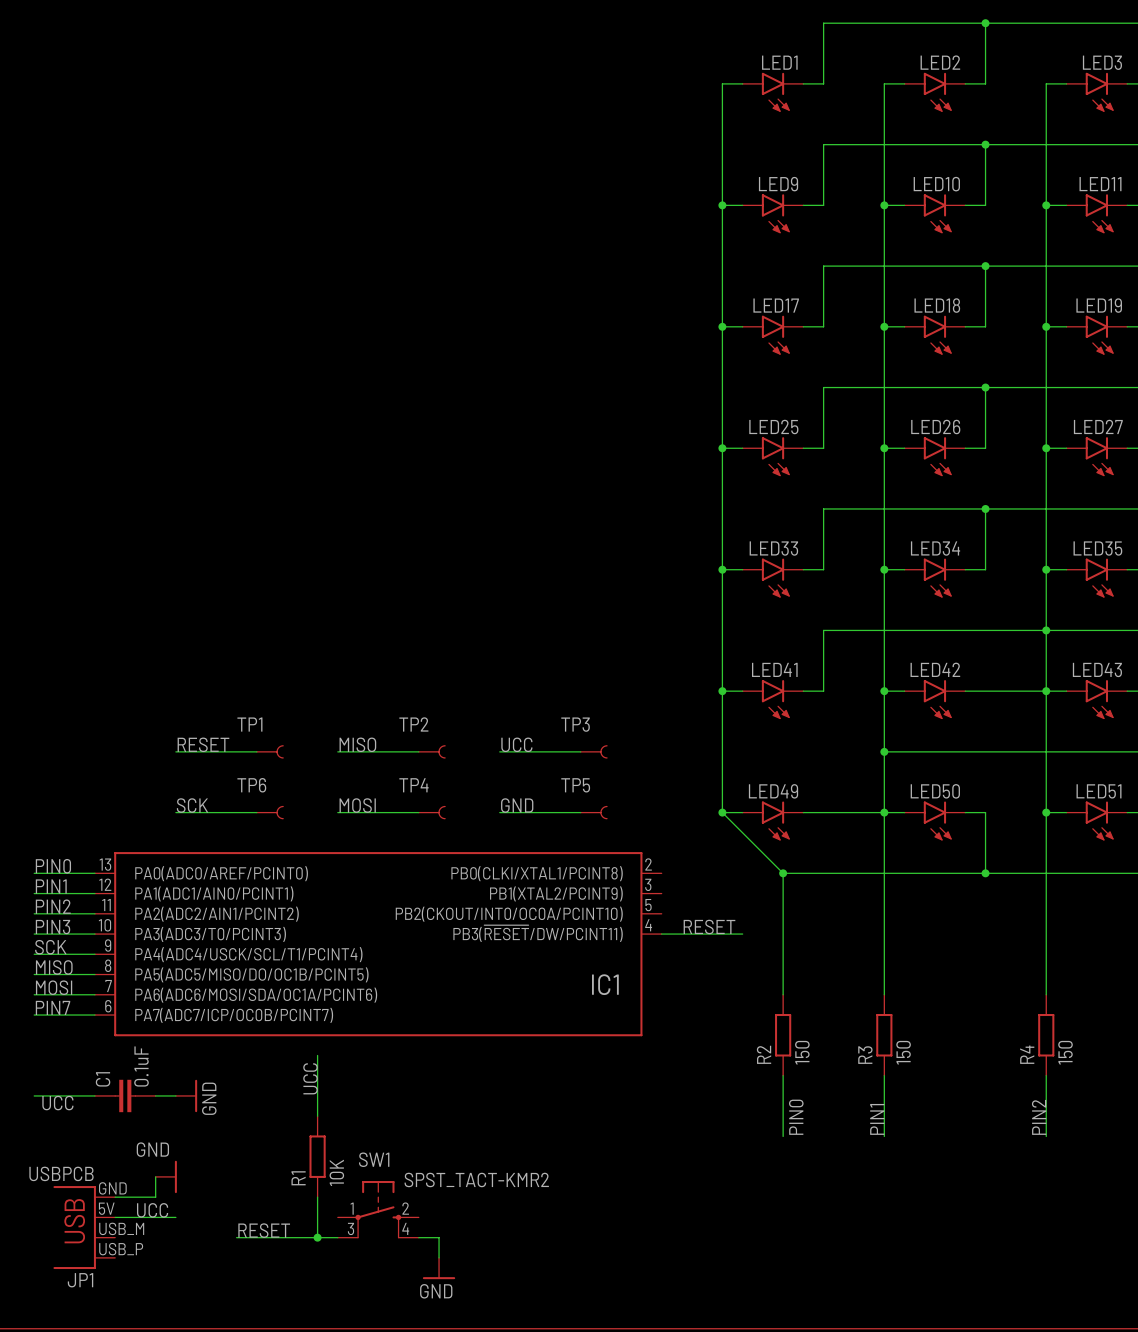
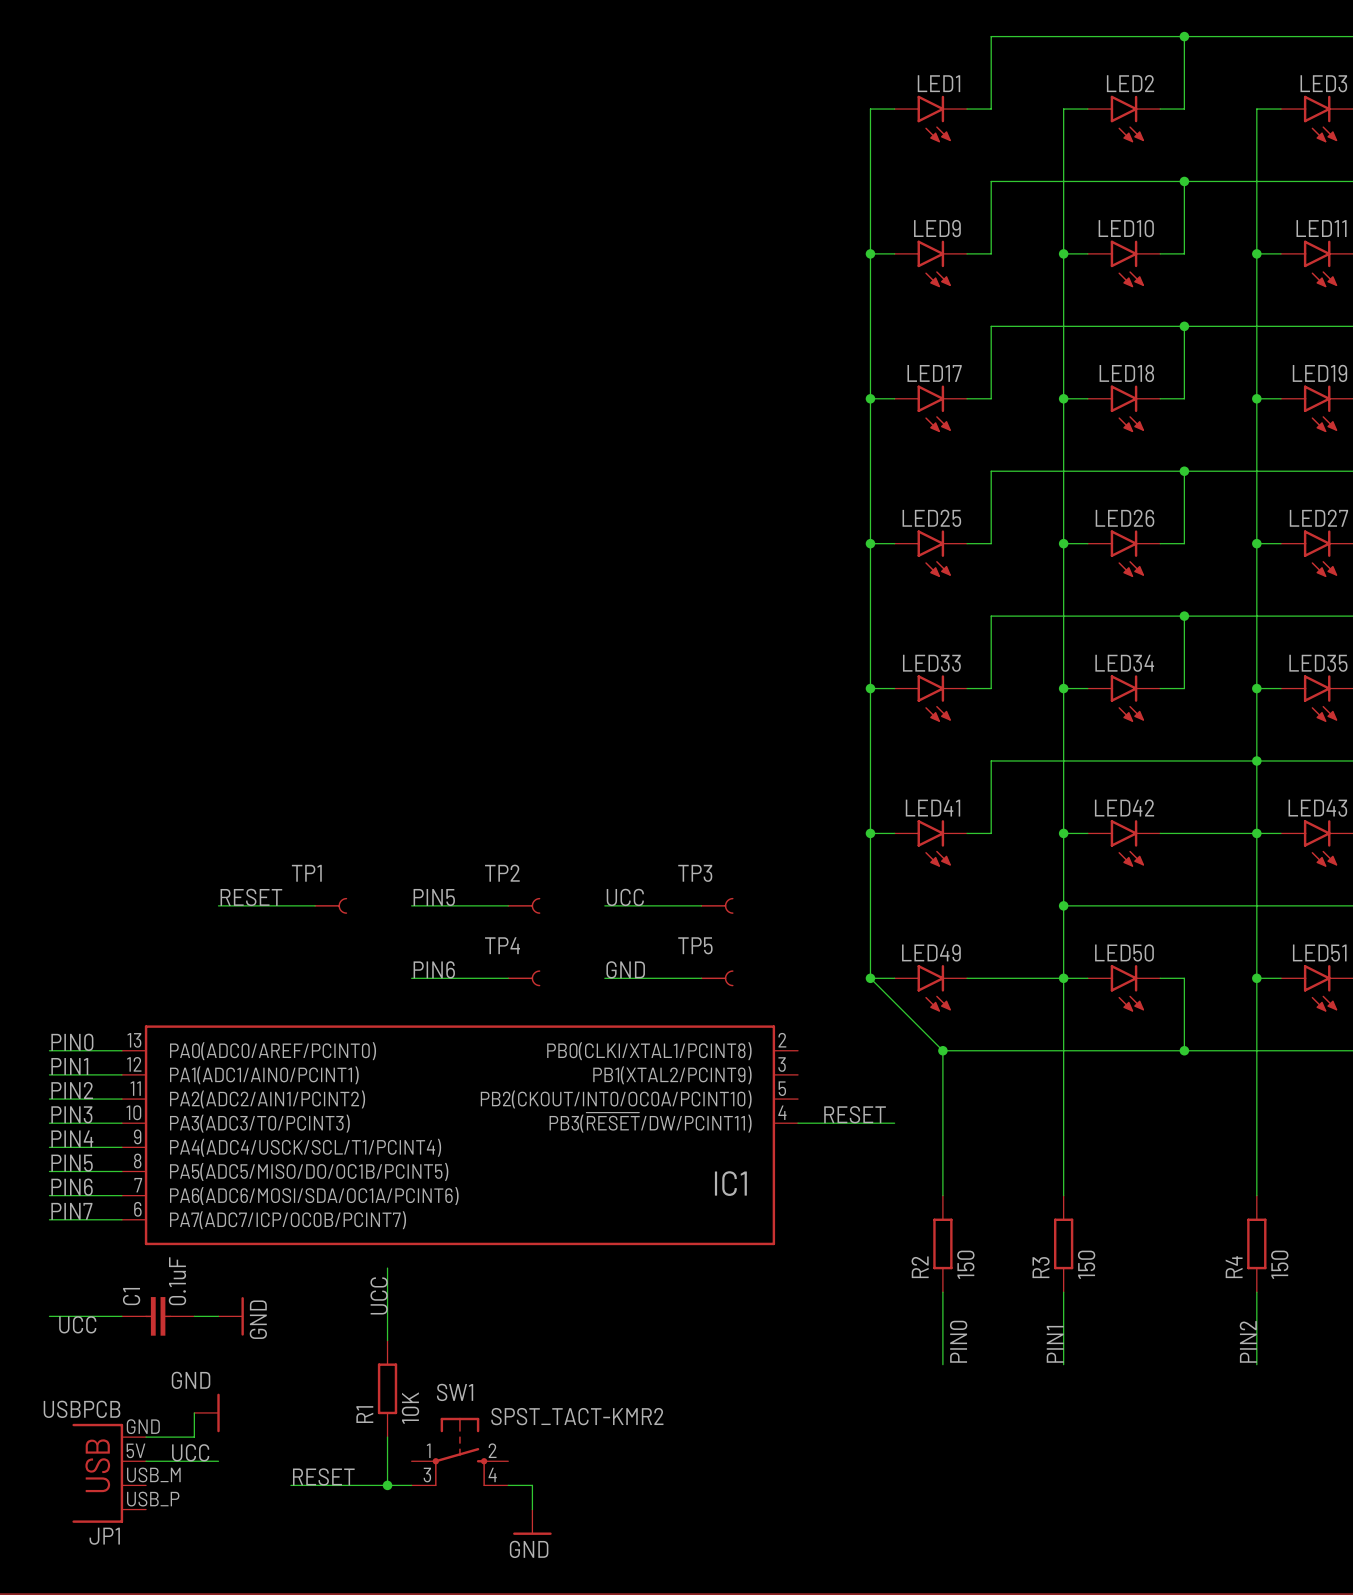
label: MISO (357, 744) -> PIN5 (434, 897)
label: SCK (192, 805) -> none
label: MOSI (357, 805) -> PIN6 (434, 969)
wire: (175, 812) (256, 812) -> none
TP6: (270, 812) -> none
label: SCK (50, 947) -> PIN4 (72, 1138)
label: MISO (54, 967) -> PIN5 (72, 1163)
label: MOSI (54, 987) -> PIN6 (72, 1187)

